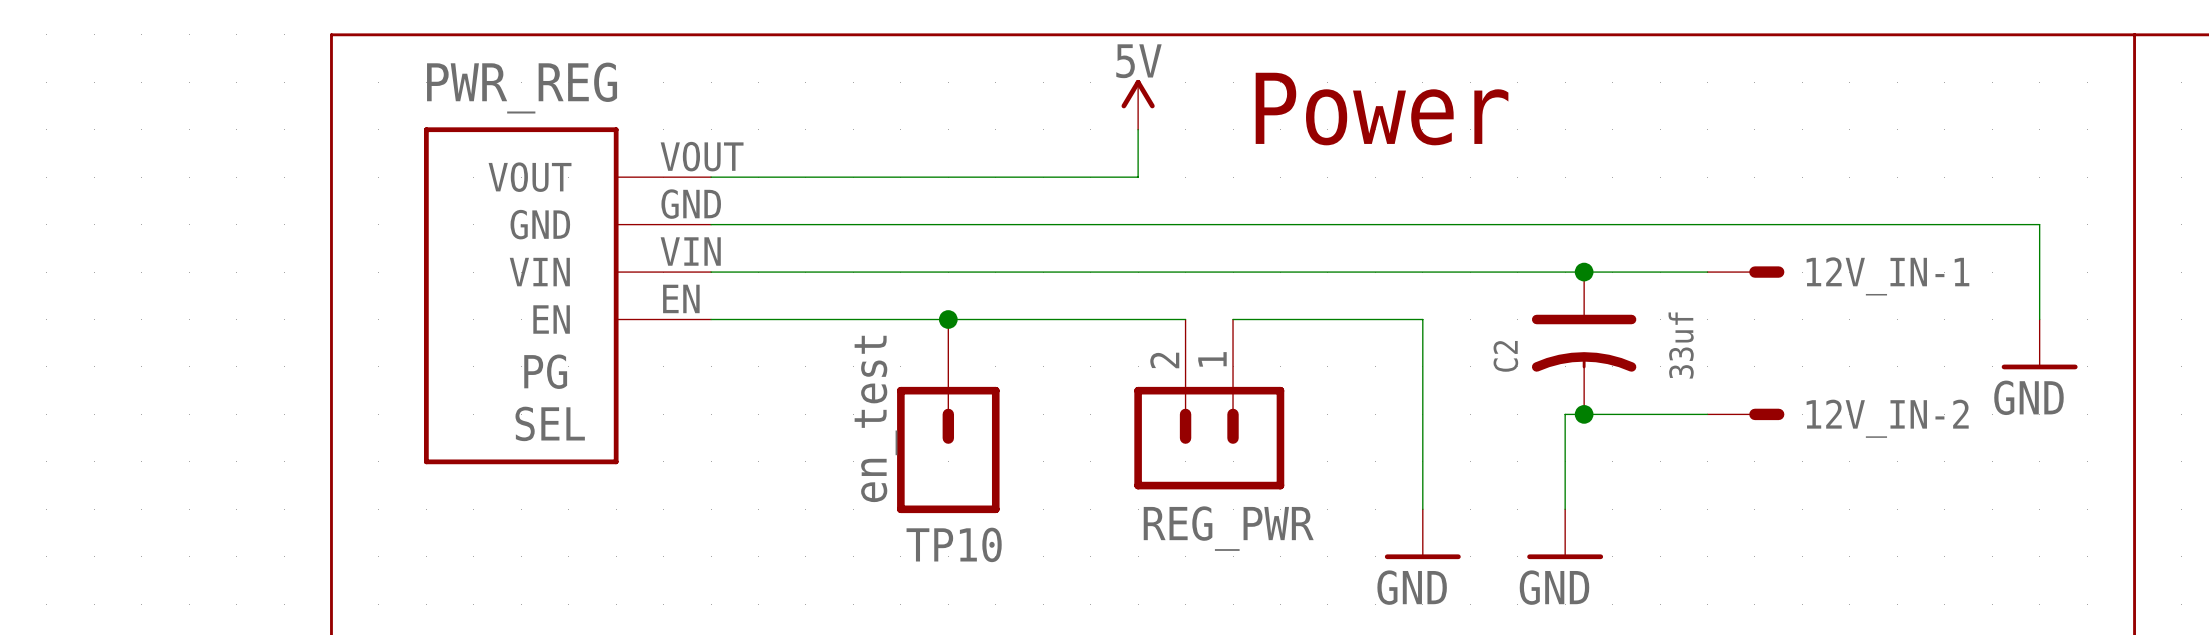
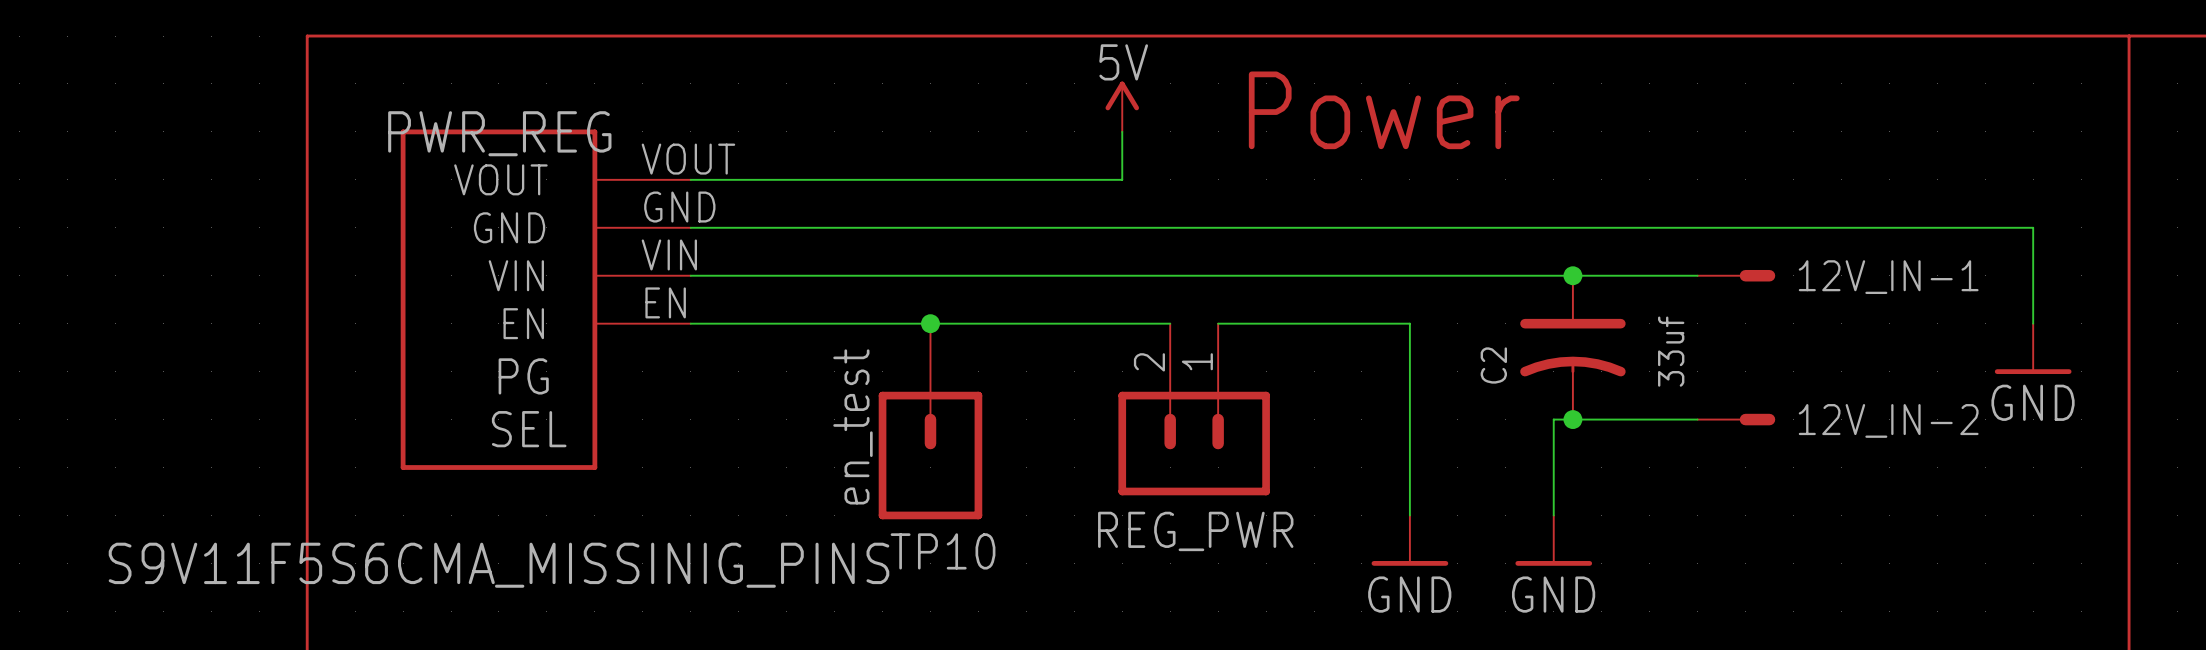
PWR_REG name position: PWR_REG (522, 88) -> PWR_REG (499, 133)
PWR_REG value: none -> S9V11F5S6CMA_MISSINIG_PINS (498, 565)

